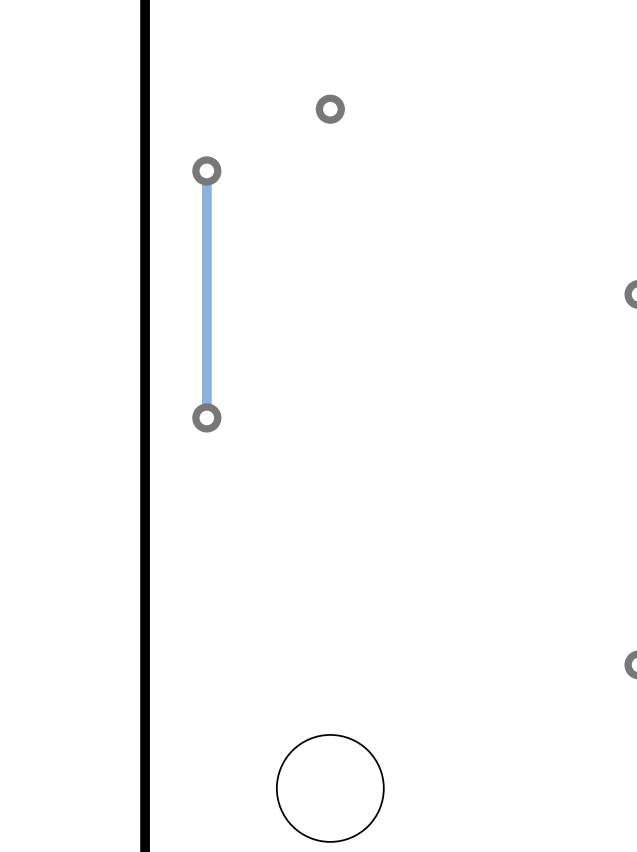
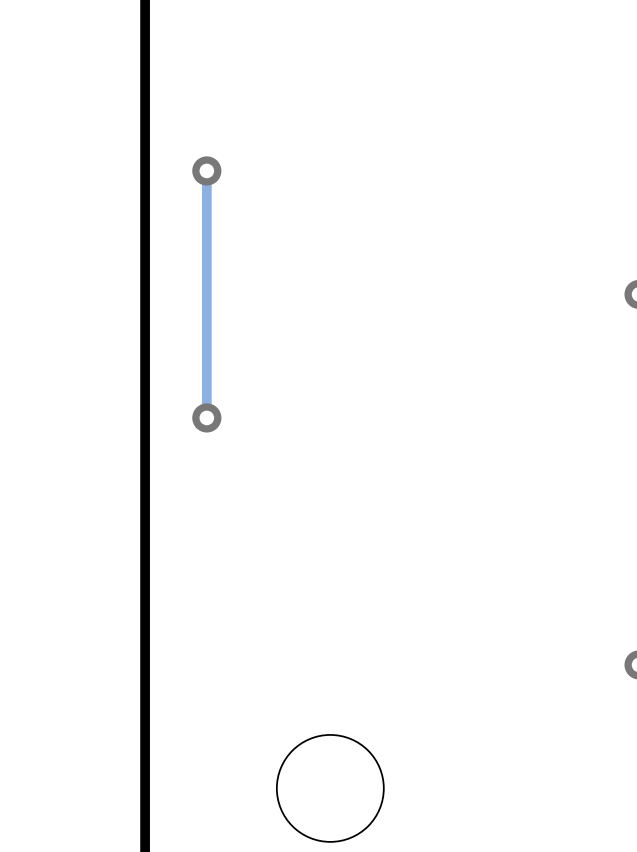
via: (330, 109) -> none

